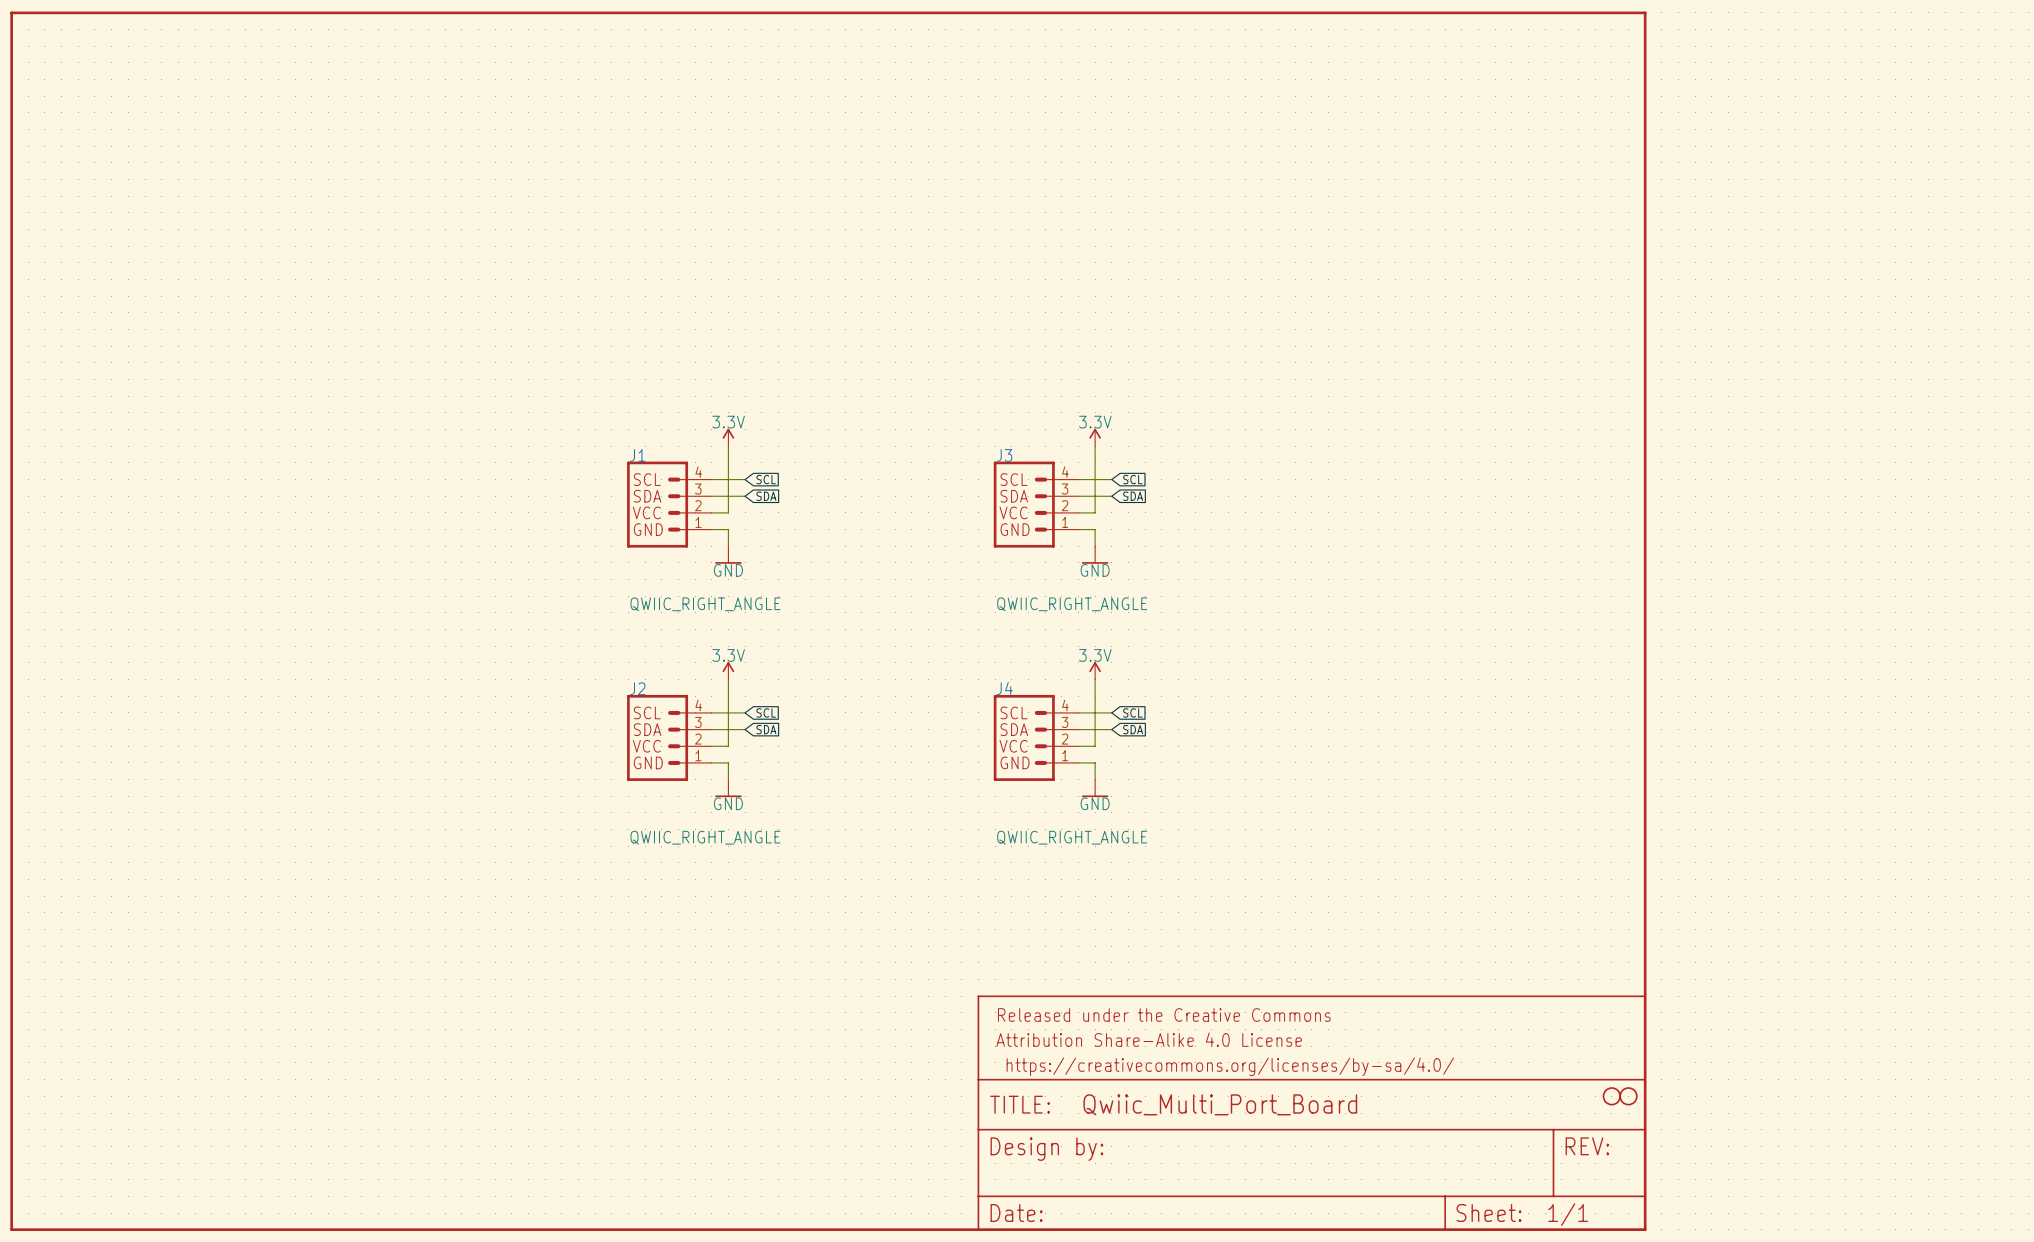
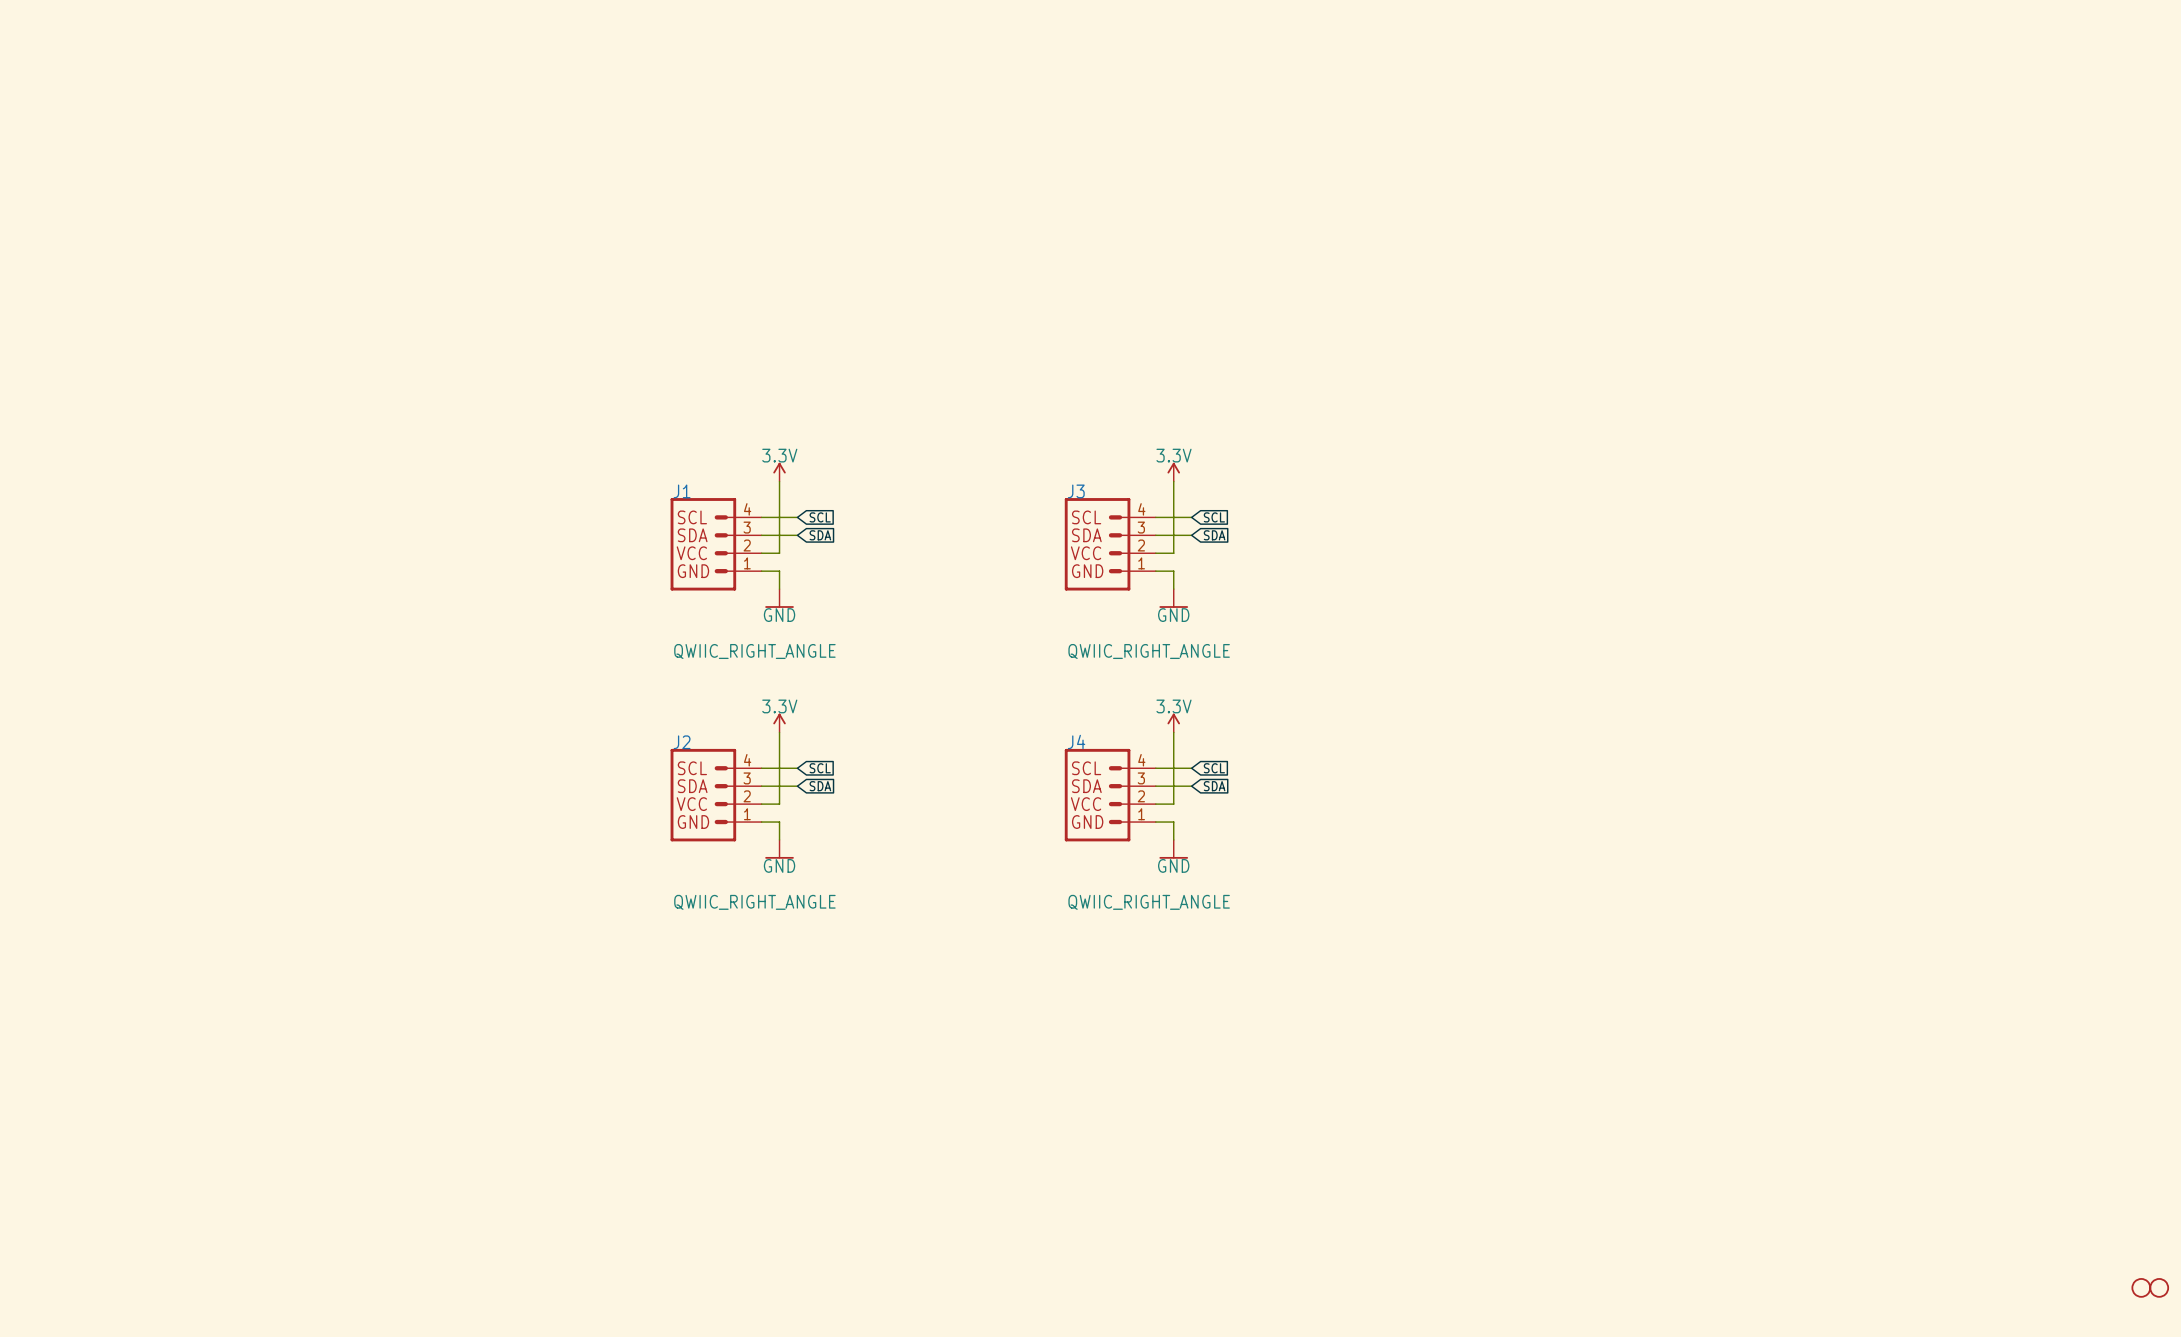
part: (828, 621) -> none
part: (1611, 1096) -> none
part: (1628, 1096) -> none
part: (1311, 1113) -> none
part: none -> (2141, 1287)
part: none -> (2159, 1287)

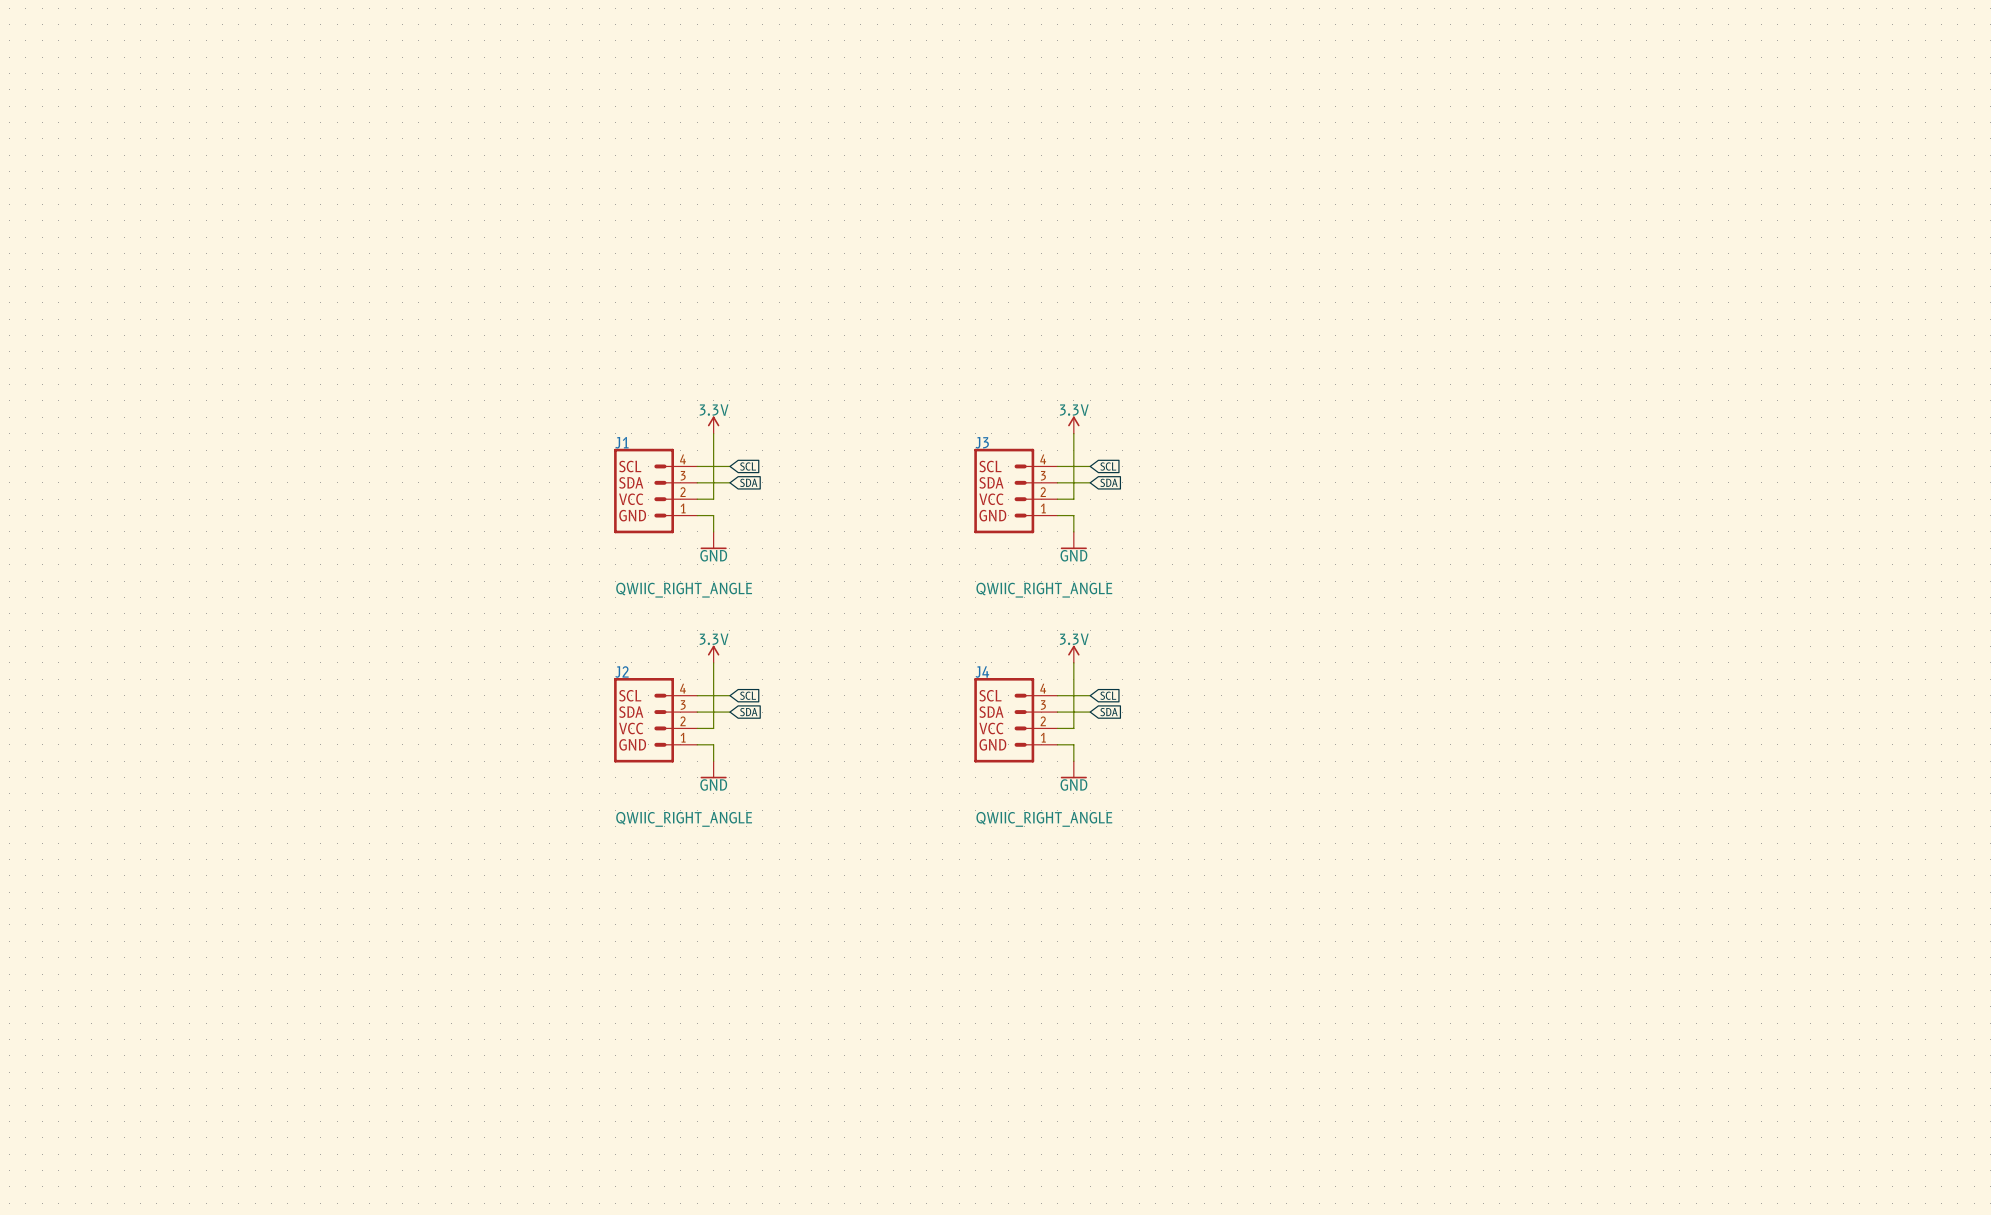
part: (2141, 1287) -> none
part: (2159, 1287) -> none

